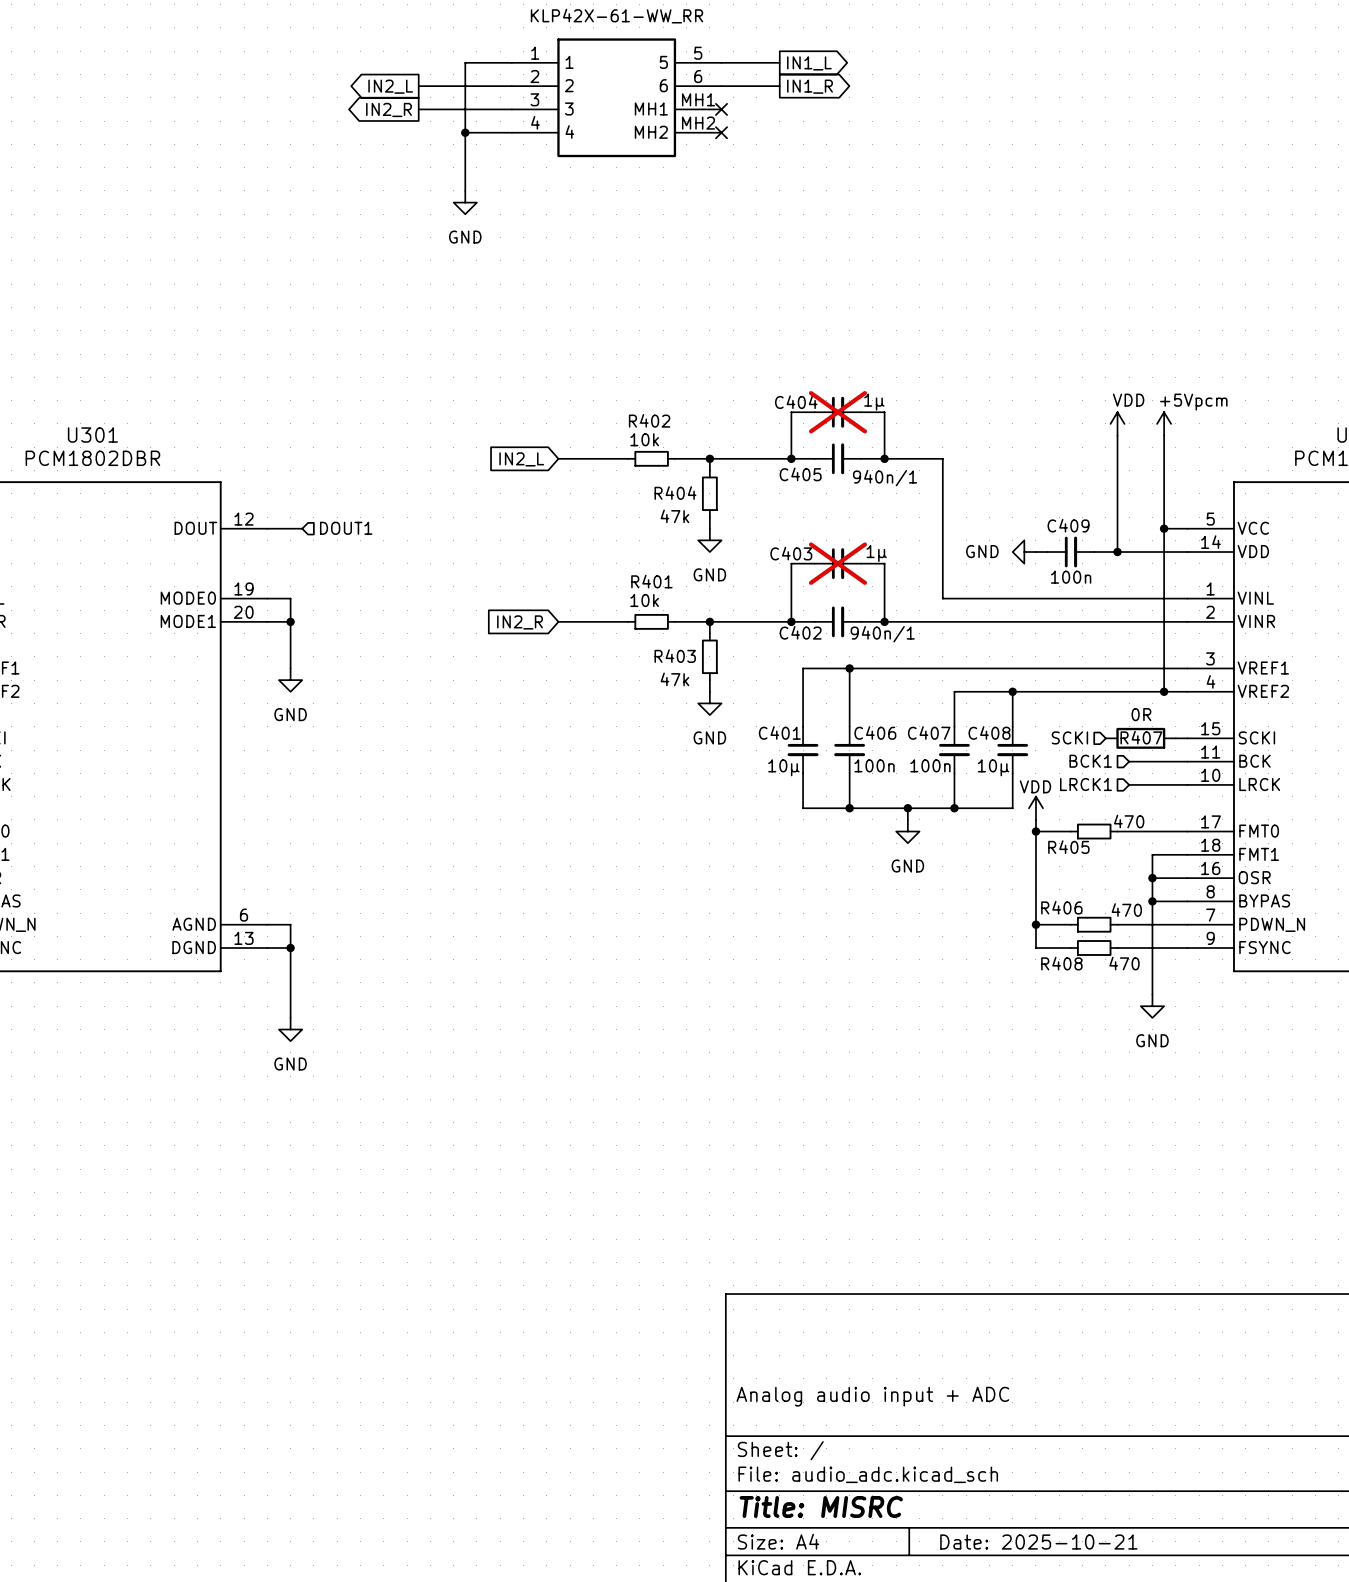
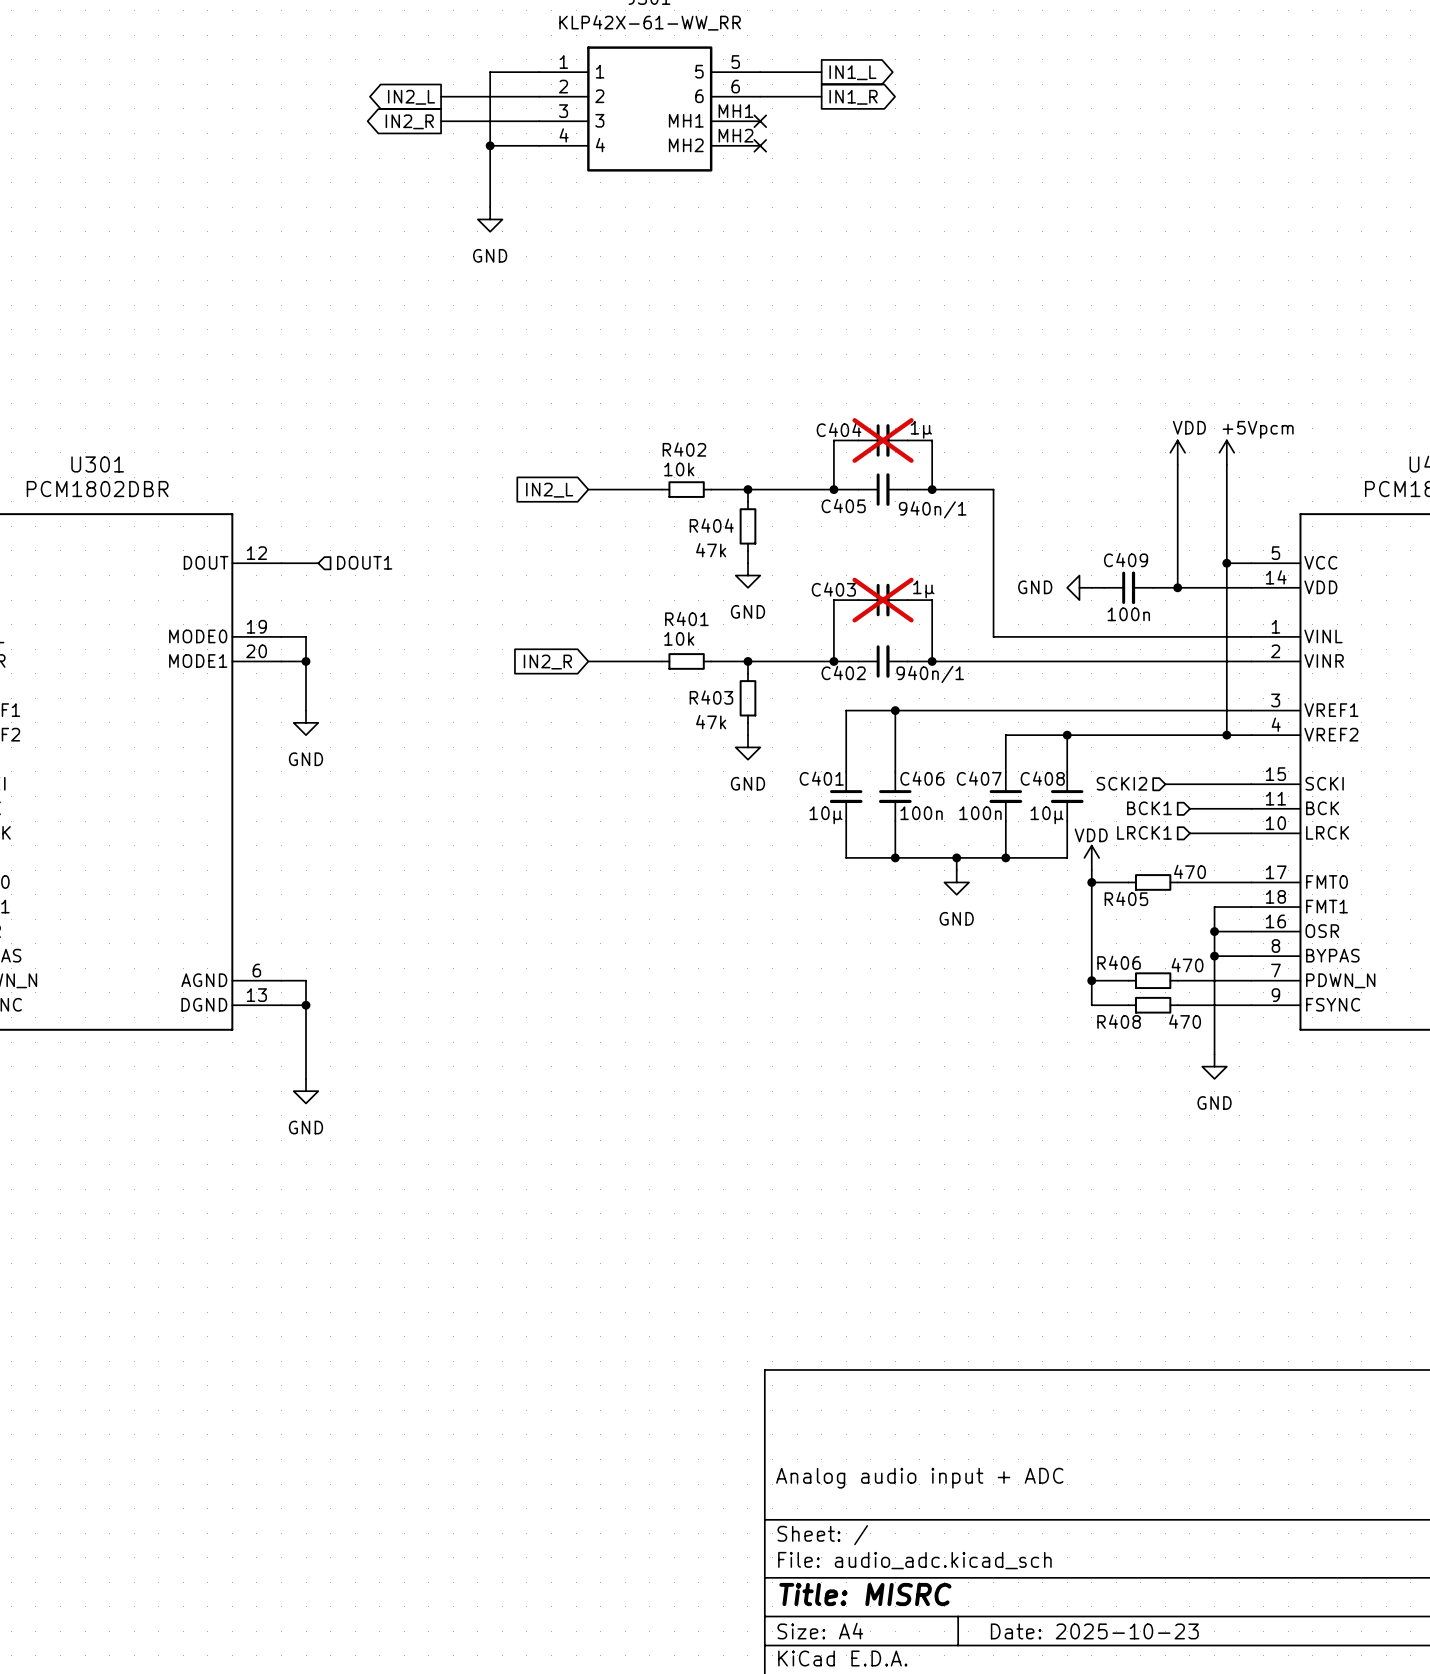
hierarchical label: SCKI (1069, 737) -> SCKI2 (1121, 783)
R407: 0R (1140, 738) -> none
title block: Date: 2025-10-21 (1038, 1542) -> Date: 2025-10-23 (1094, 1631)

